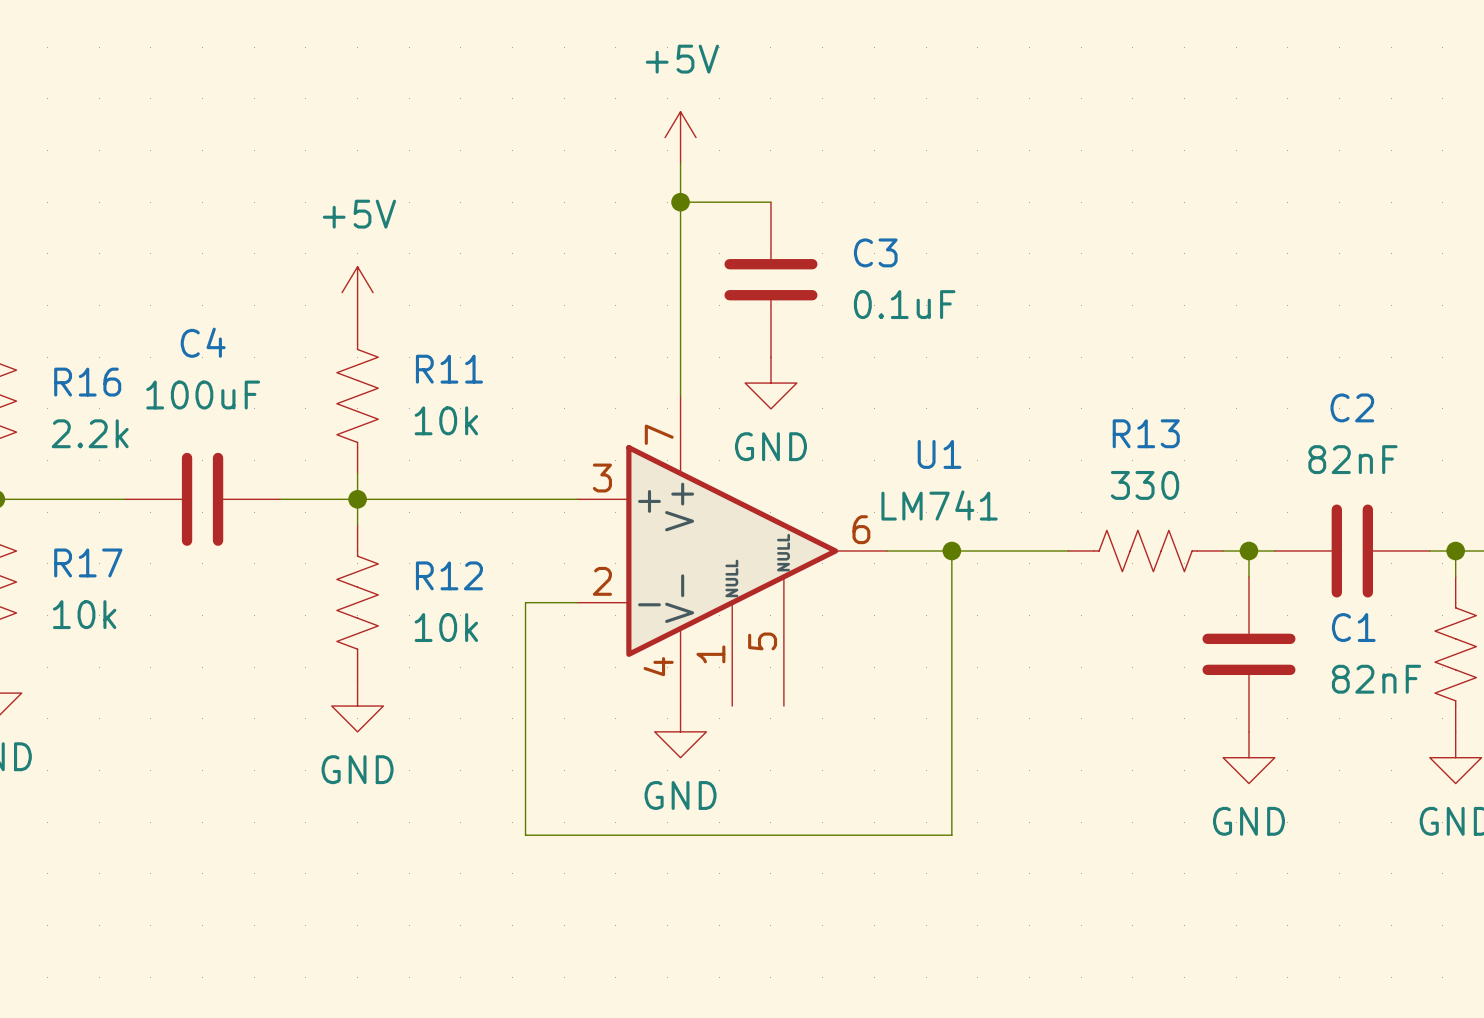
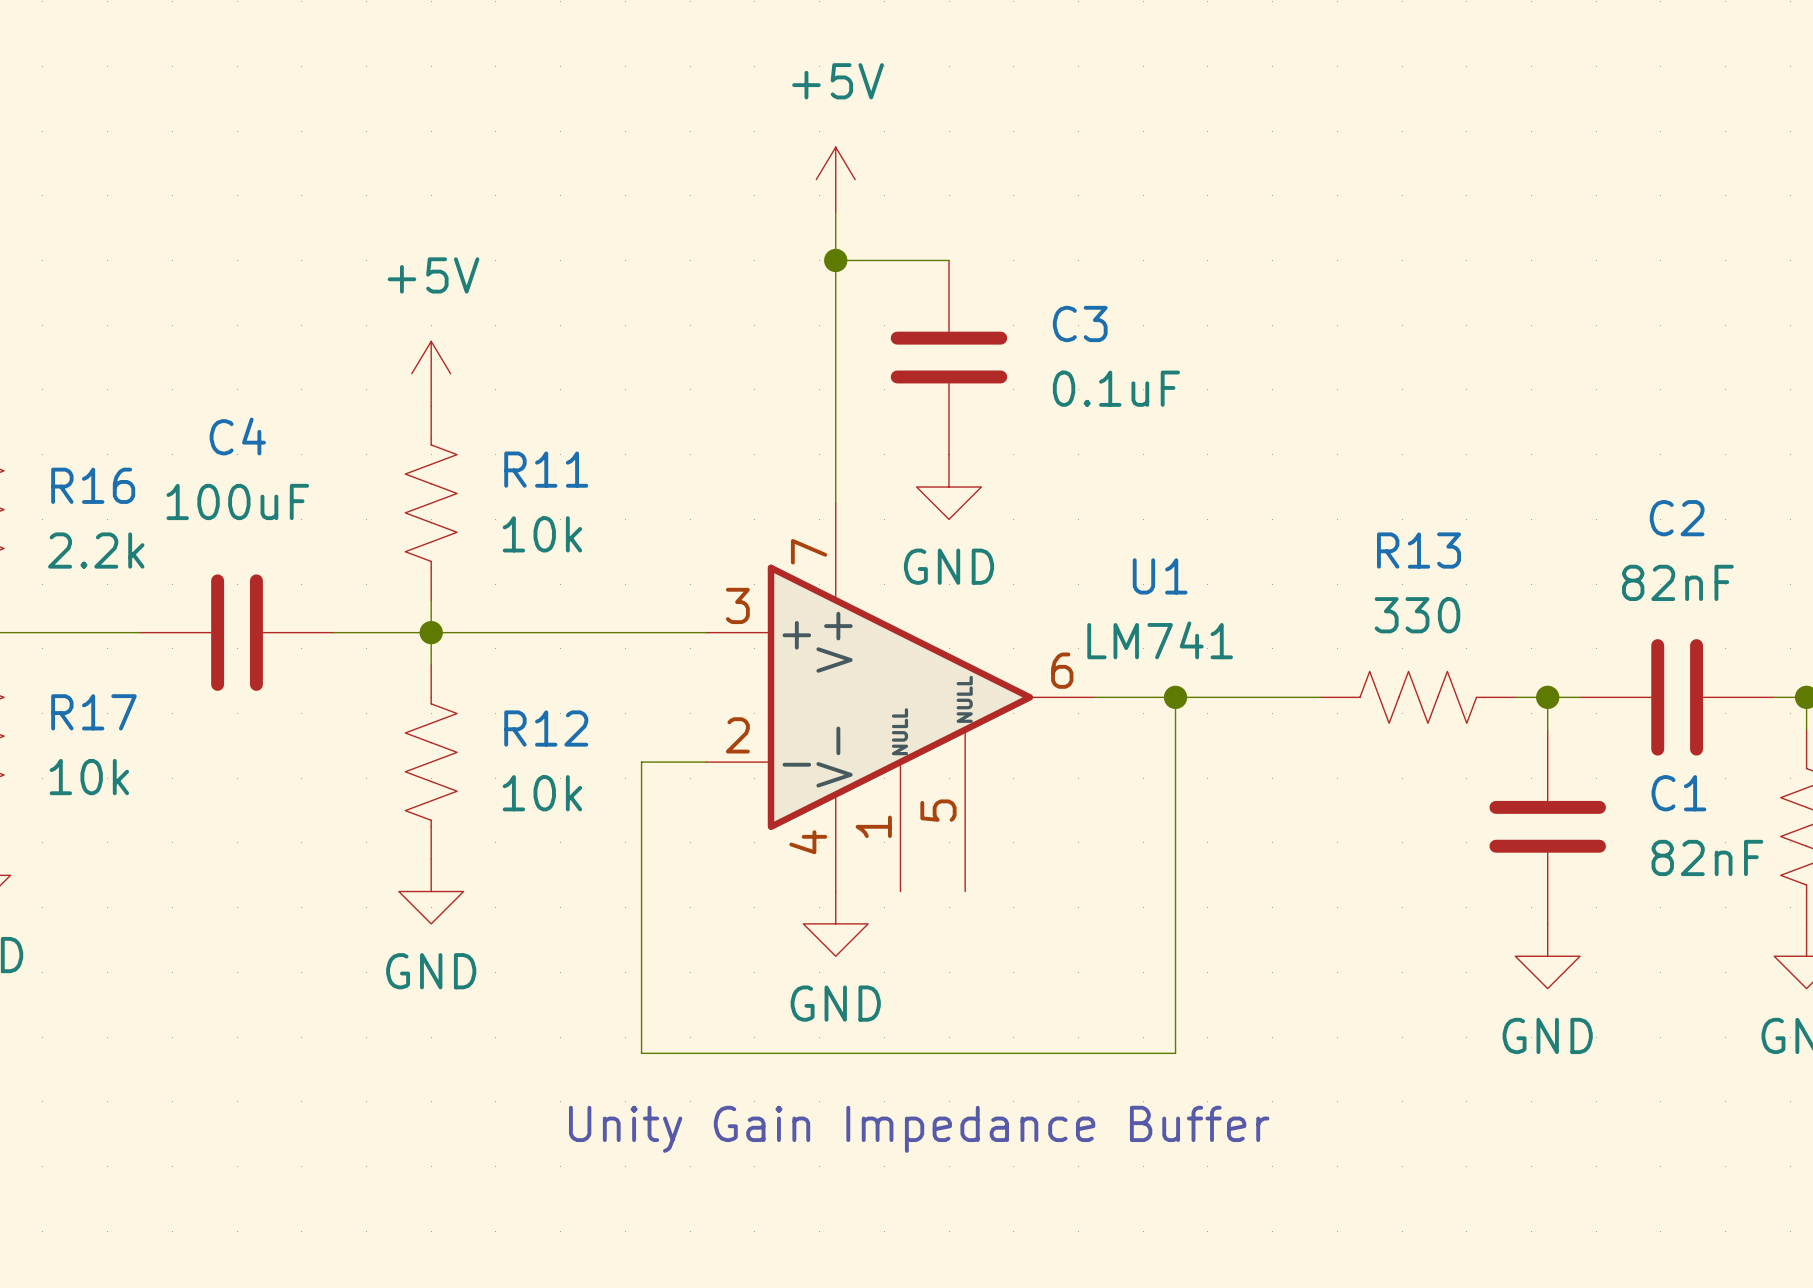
text: none -> Unity Gain Impedance Buffer (919, 1129)

